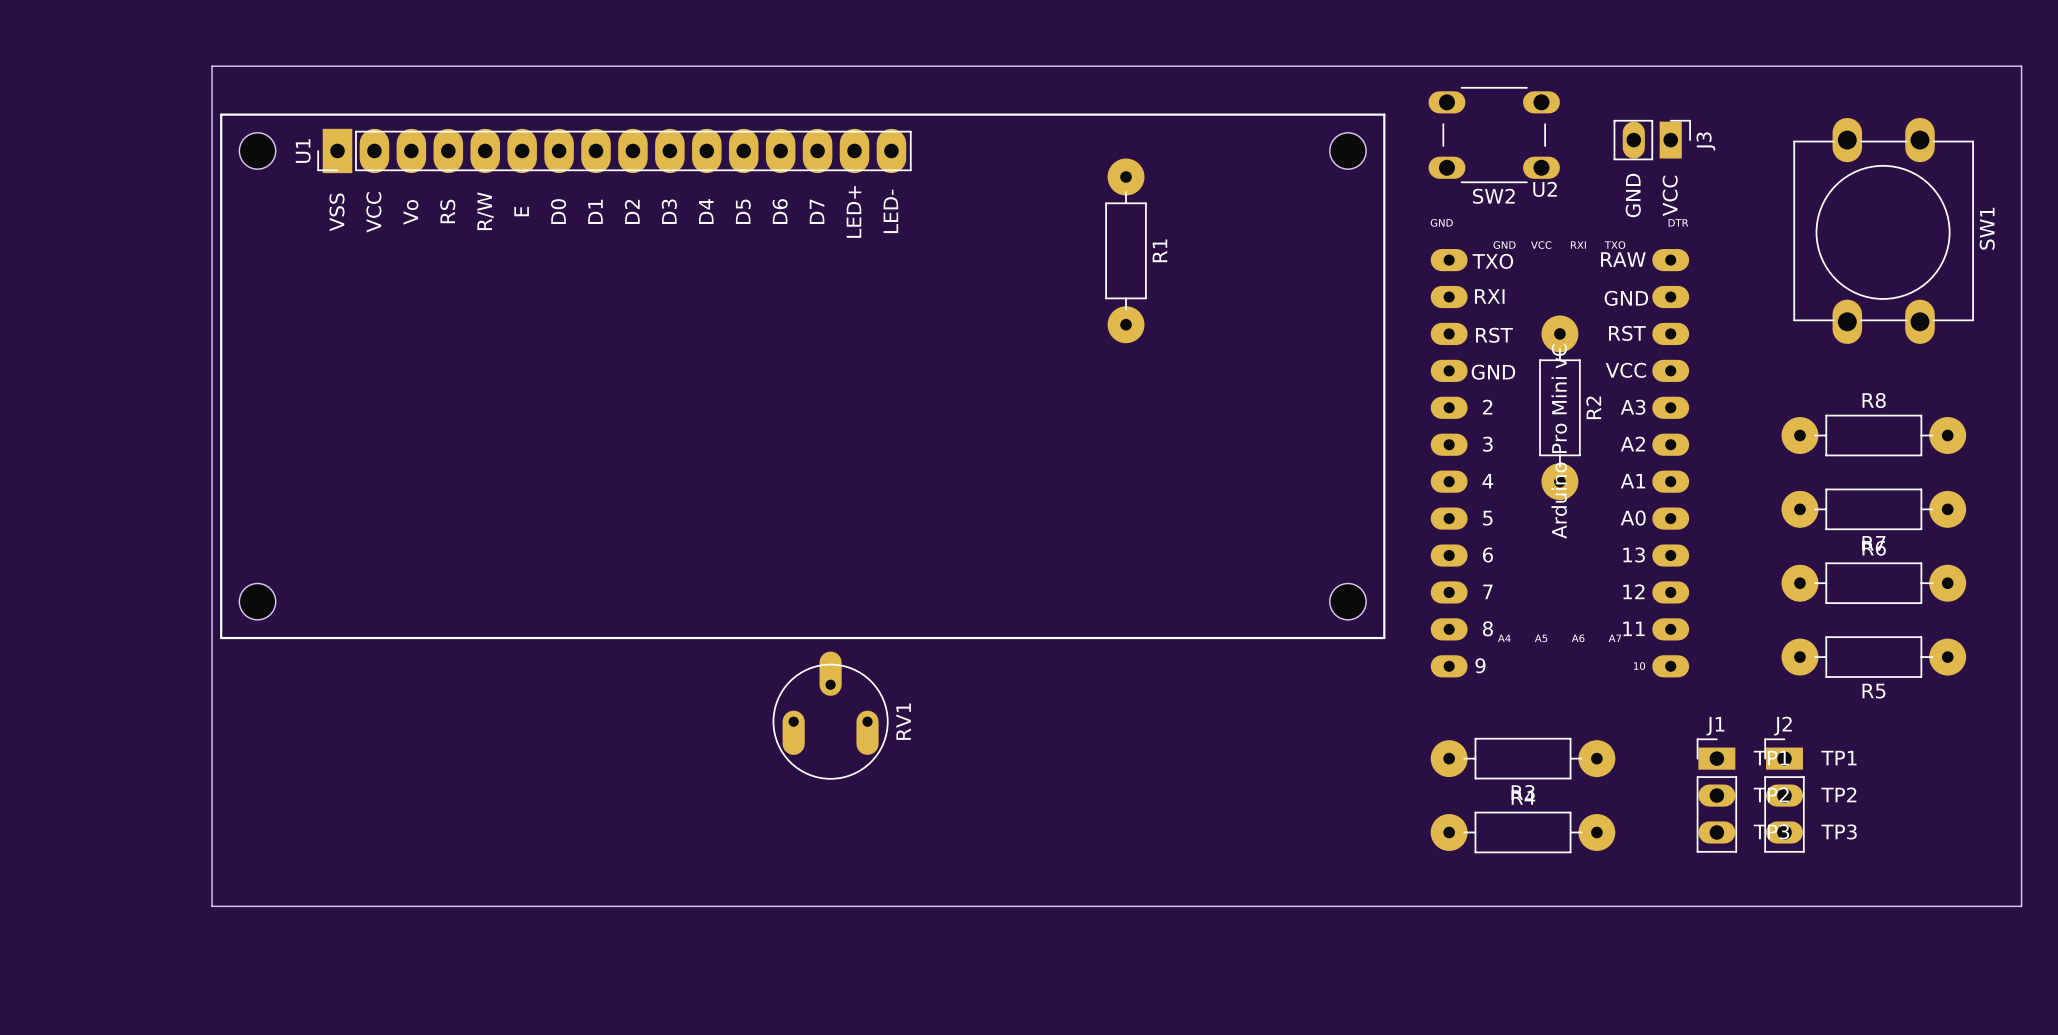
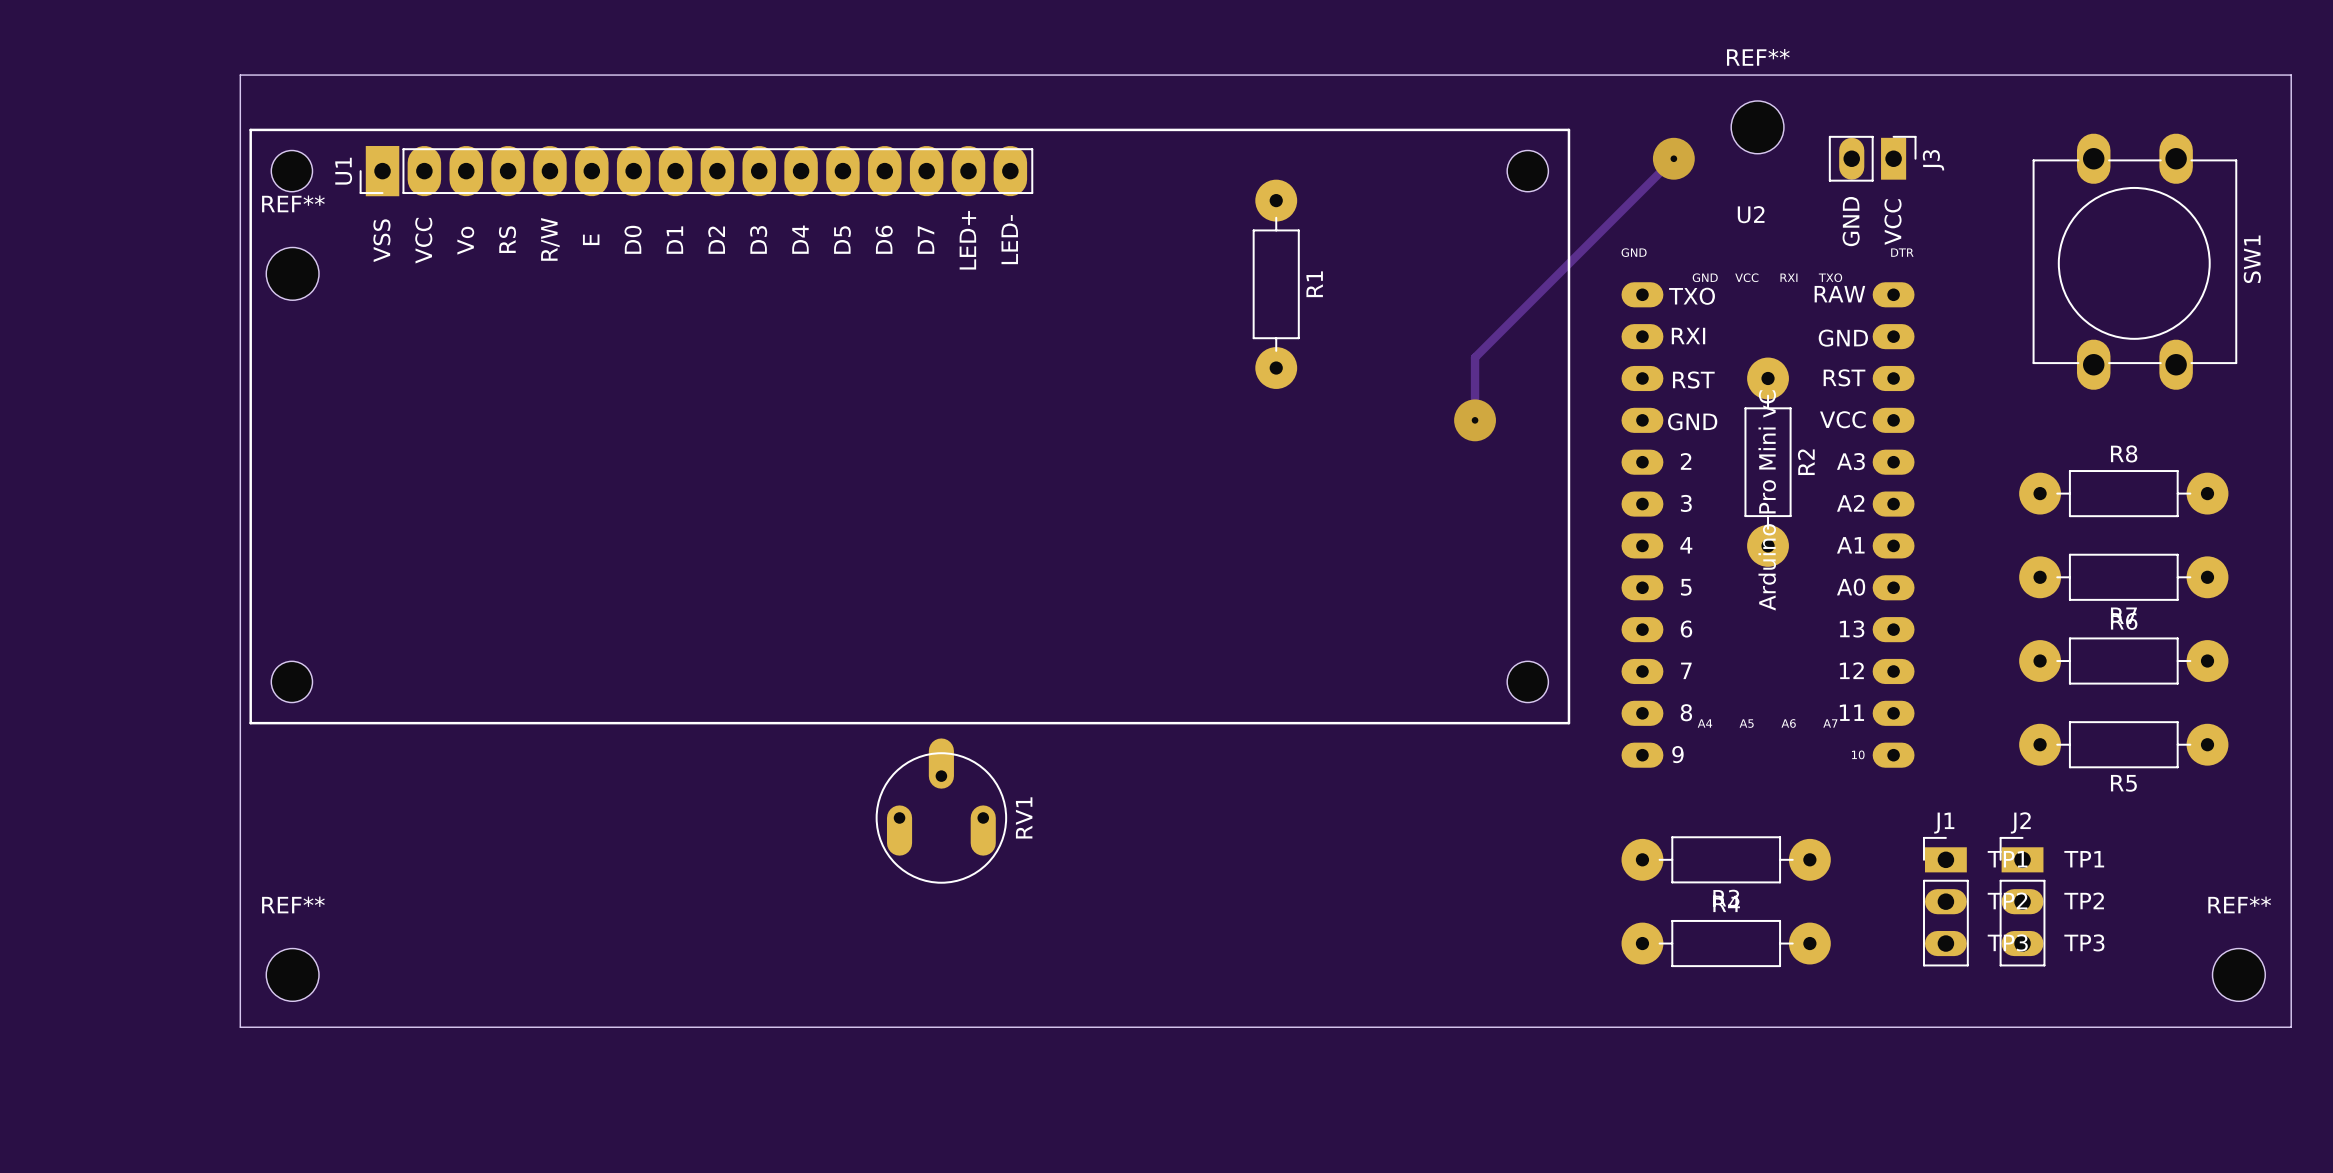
REF**: none -> (1757, 127)
SW2: (1494, 135) -> none
track: none -> (1673, 158) (1475, 357) (1475, 420)
via: none -> (1673, 158)
REF**: none -> (292, 273)
via: none -> (1475, 420)
REF**: none -> (292, 974)
REF**: none -> (2238, 974)

